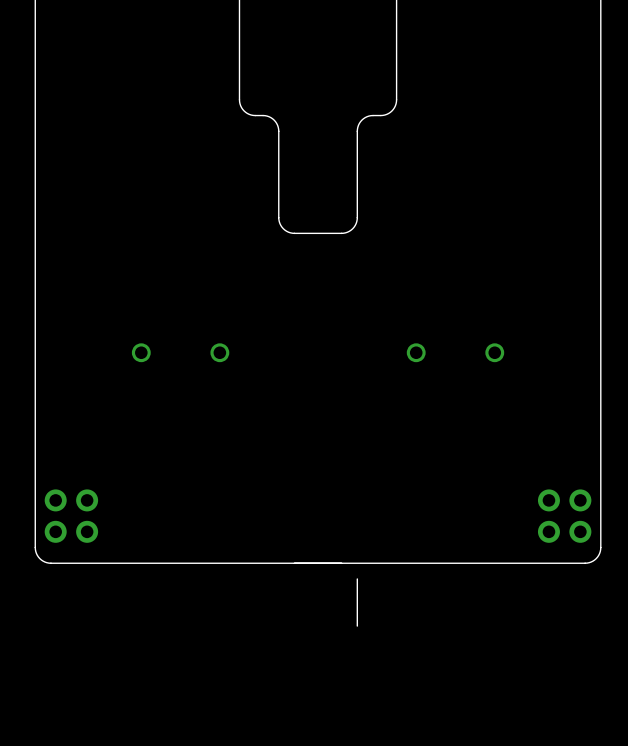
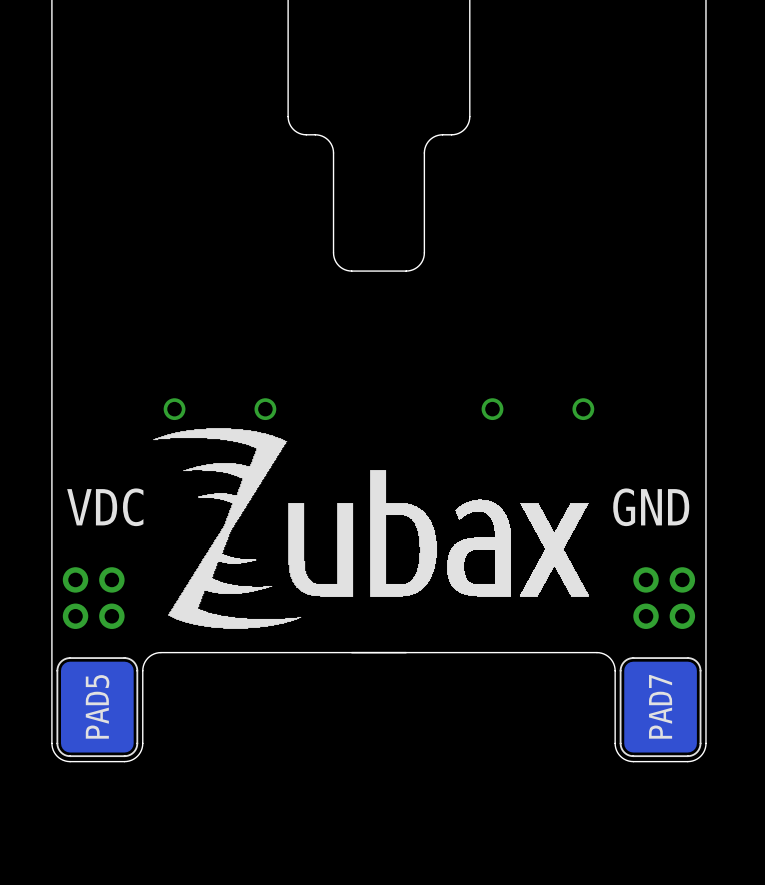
drawing: none -> [153, 428, 589, 629]
text: none -> VDC (105, 507)
text: none -> GND (651, 507)
board edge: (35, 547) (38, 557) (48, 563) (129, 563) -> (51, 634) (52, 745) (57, 756) (67, 761) (126, 761) (139, 754) (142, 743) (143, 666) (149, 656) (160, 652)
board edge: (600, 547) (597, 557) (587, 563) (506, 563) -> (705, 634) (705, 745) (700, 756) (690, 761) (630, 761) (618, 754) (615, 743) (614, 666) (608, 656) (596, 652)
board edge: (357, 578) (357, 626) -> none
PAD5: none -> (97, 707)
PAD7: none -> (660, 707)

